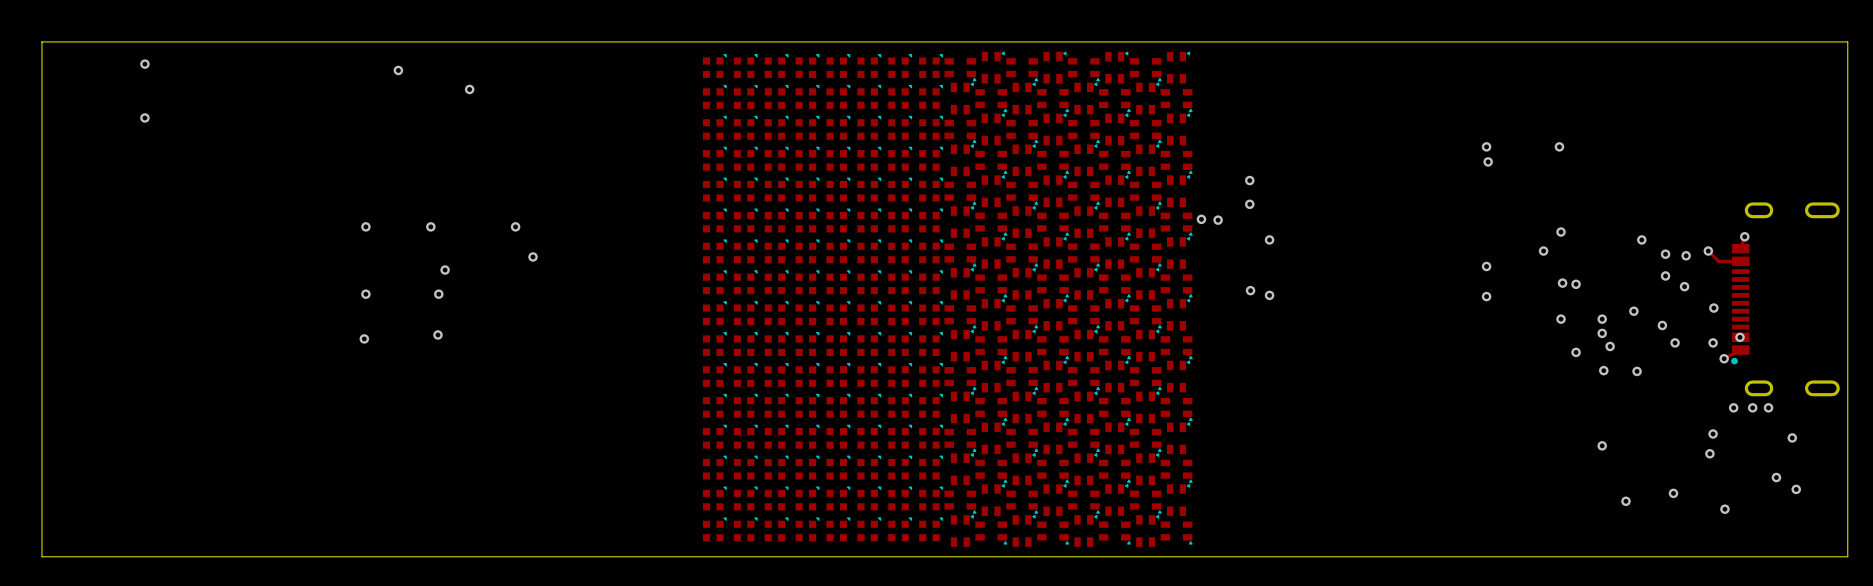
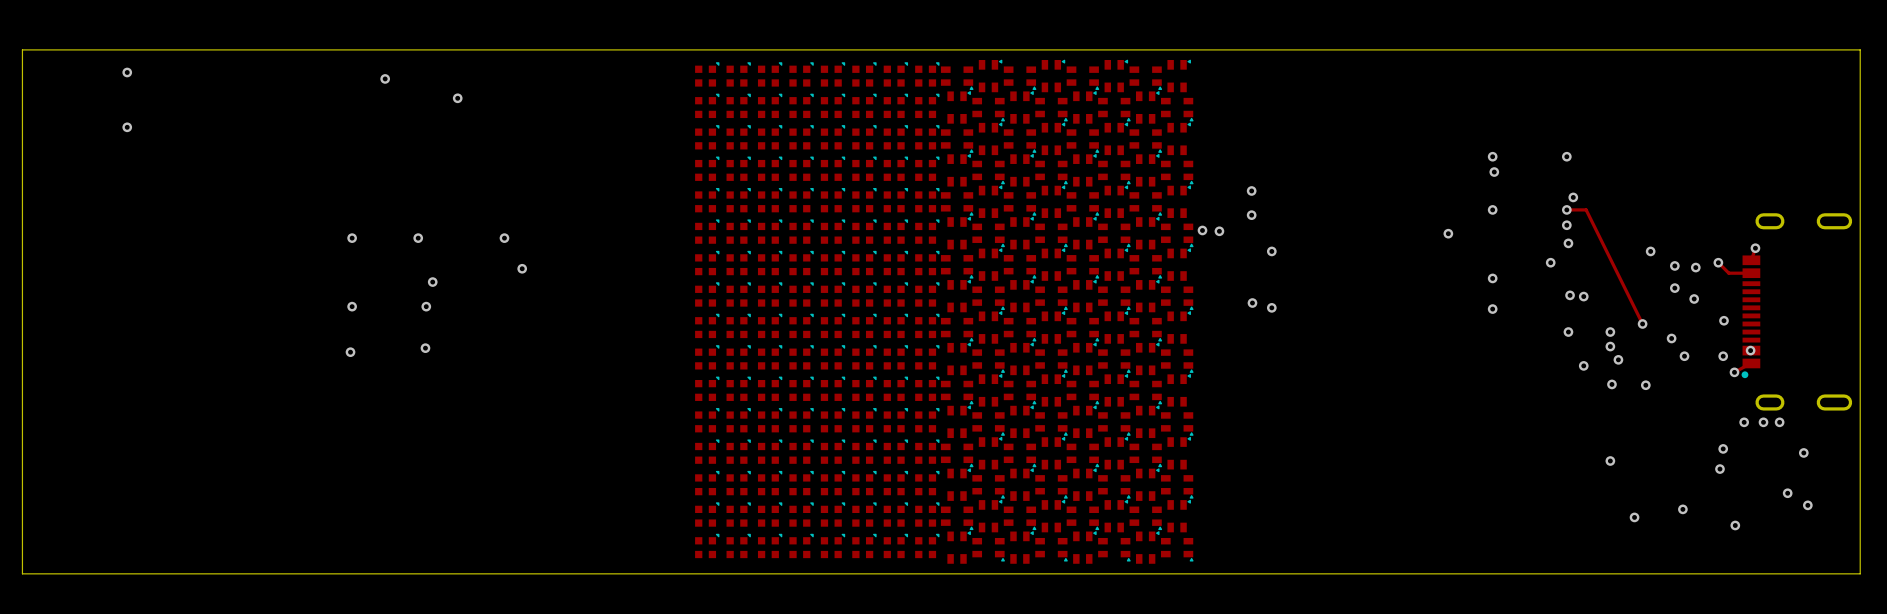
via: none -> (1573, 197)
via: none -> (1492, 209)
track: none -> (1566, 209) (1586, 209) (1642, 323)
via: none -> (1566, 209)
via: none -> (1566, 225)
via: none -> (1448, 233)

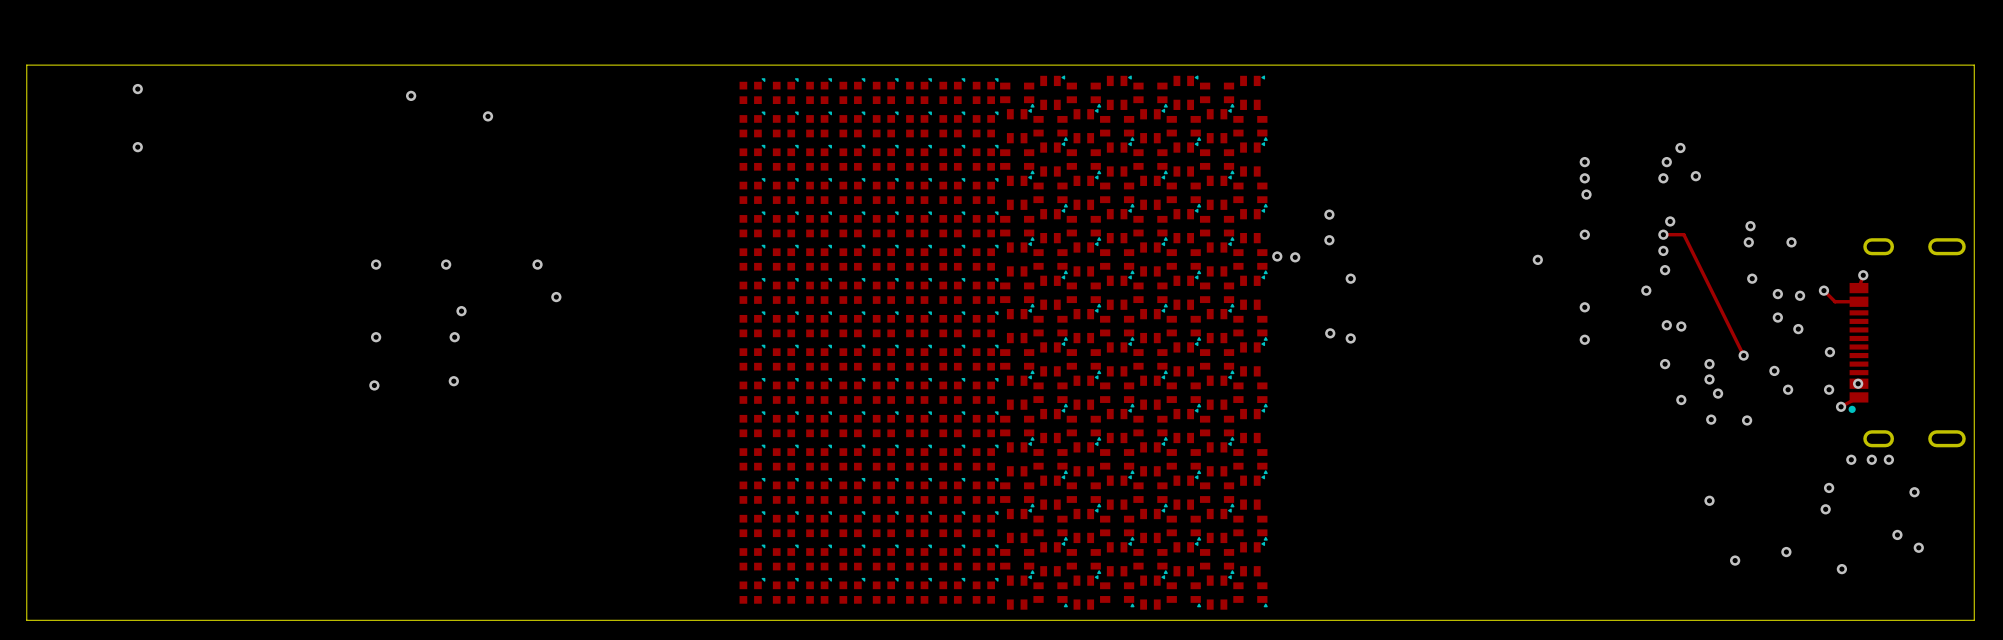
via: none -> (1680, 147)
via: none -> (1584, 162)
via: none -> (1666, 162)
via: none -> (1695, 176)
via: none -> (1750, 226)
via: none -> (1748, 242)
via: none -> (1791, 242)

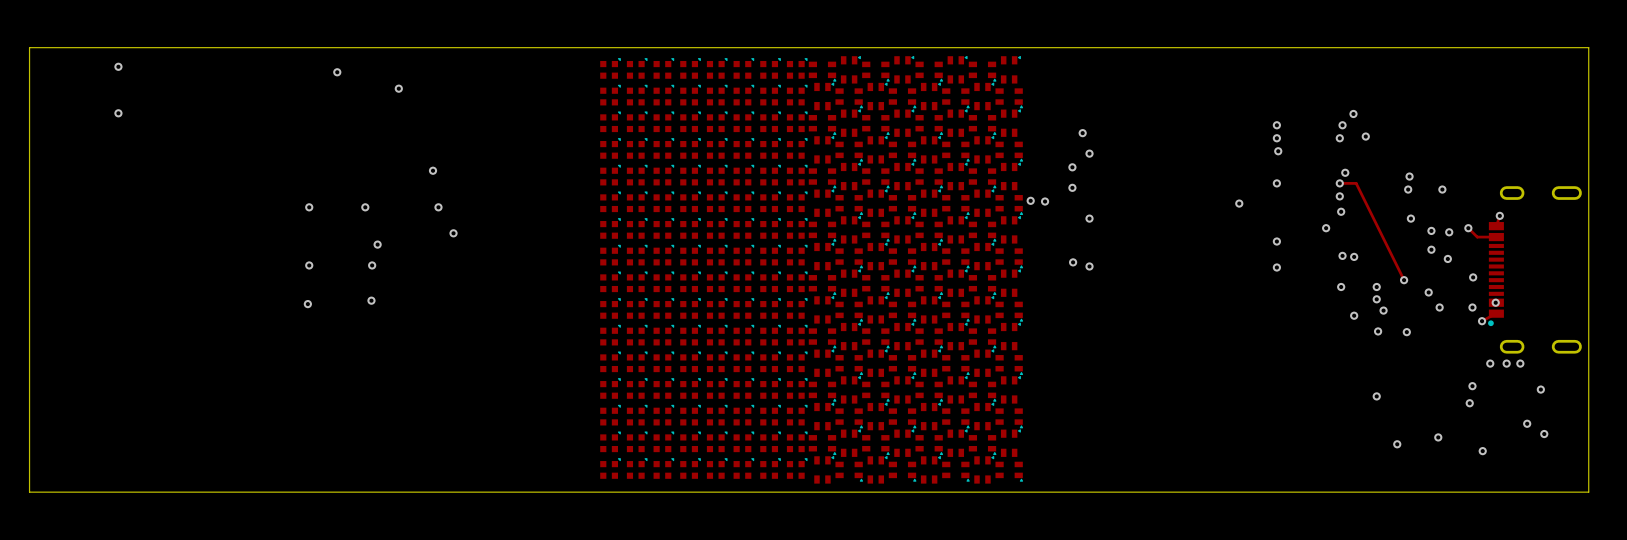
via: none -> (1082, 133)
via: none -> (1089, 153)
via: none -> (433, 170)

